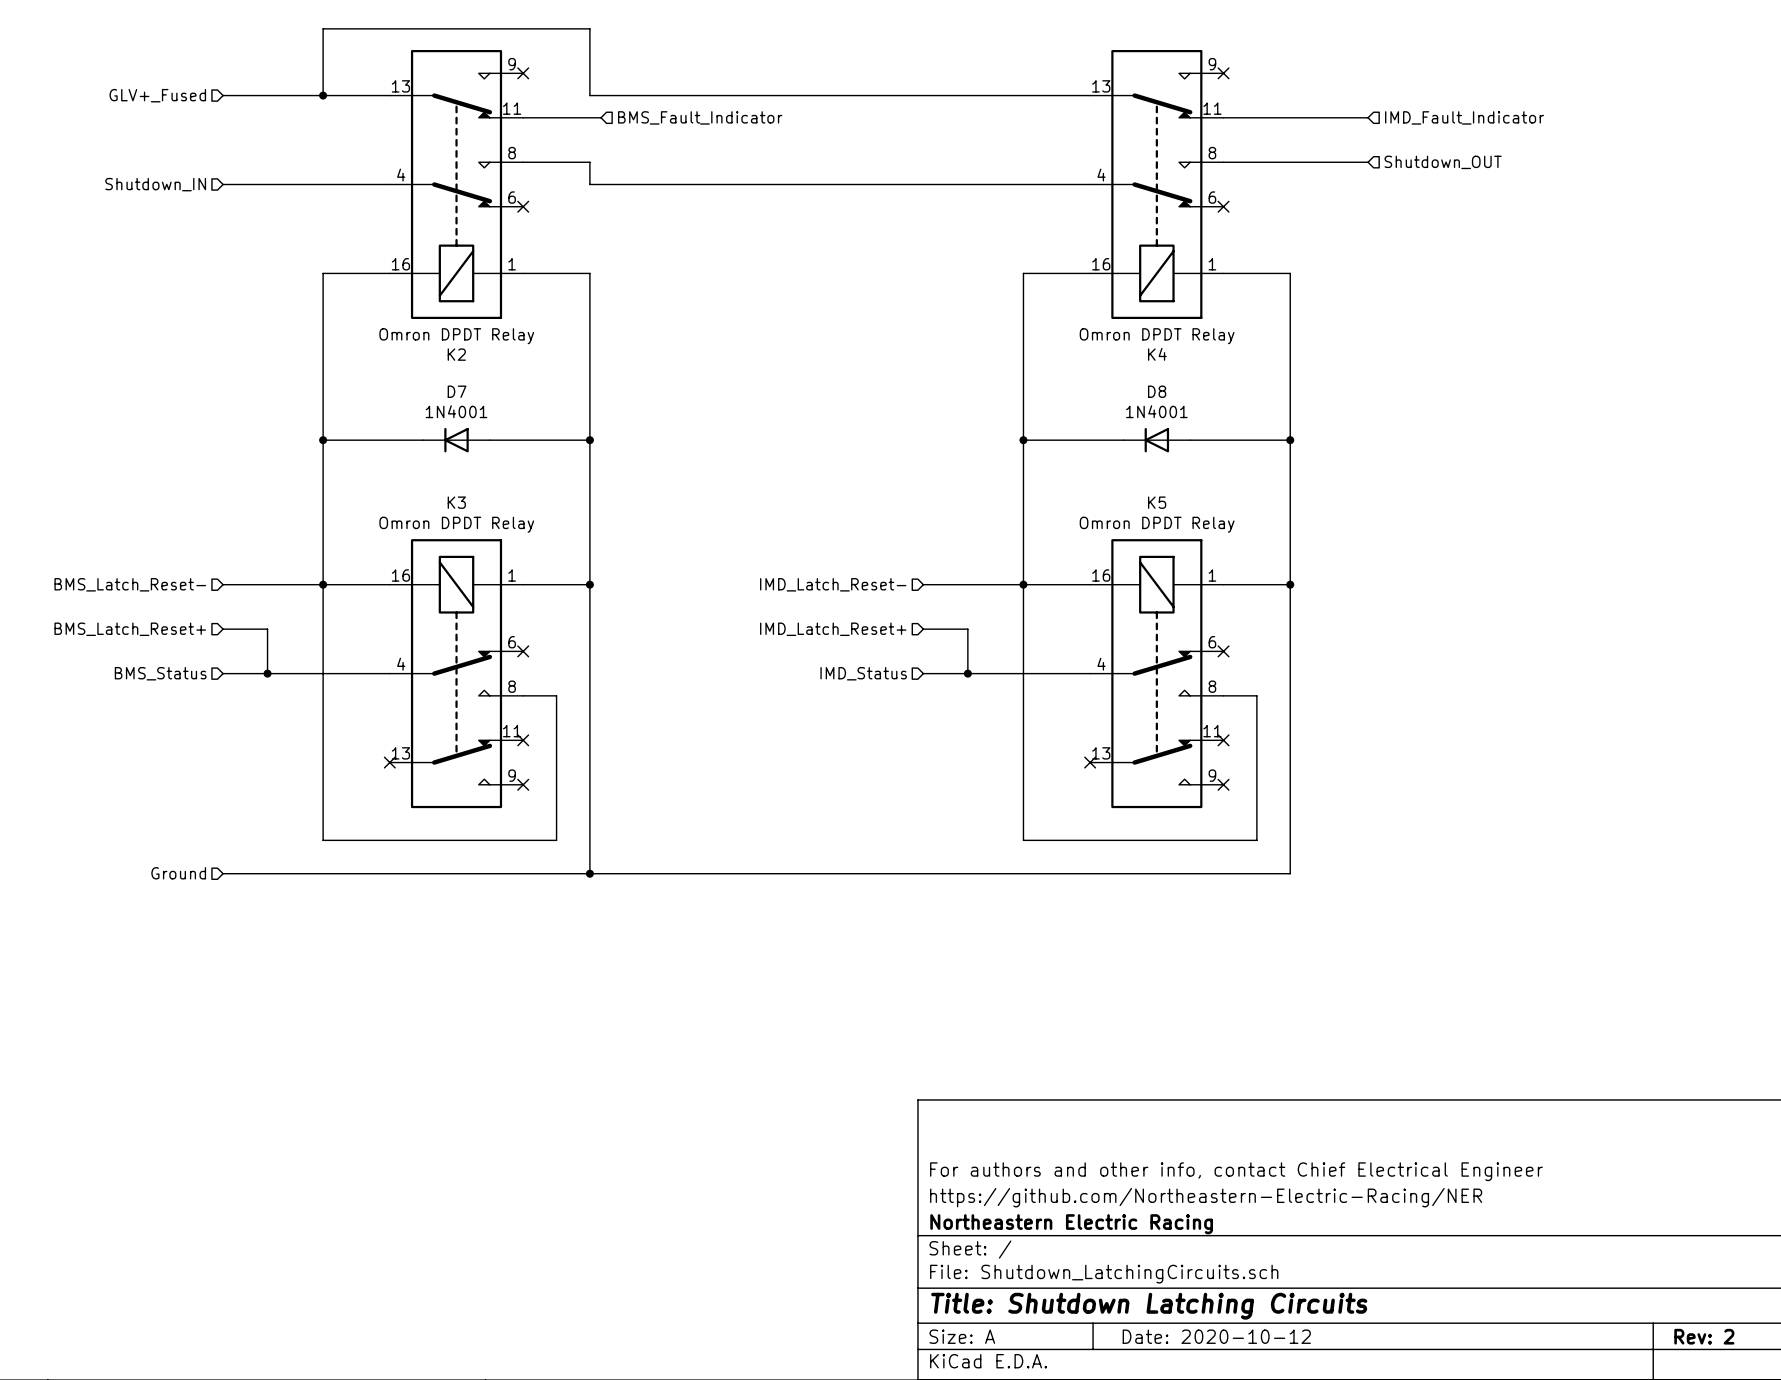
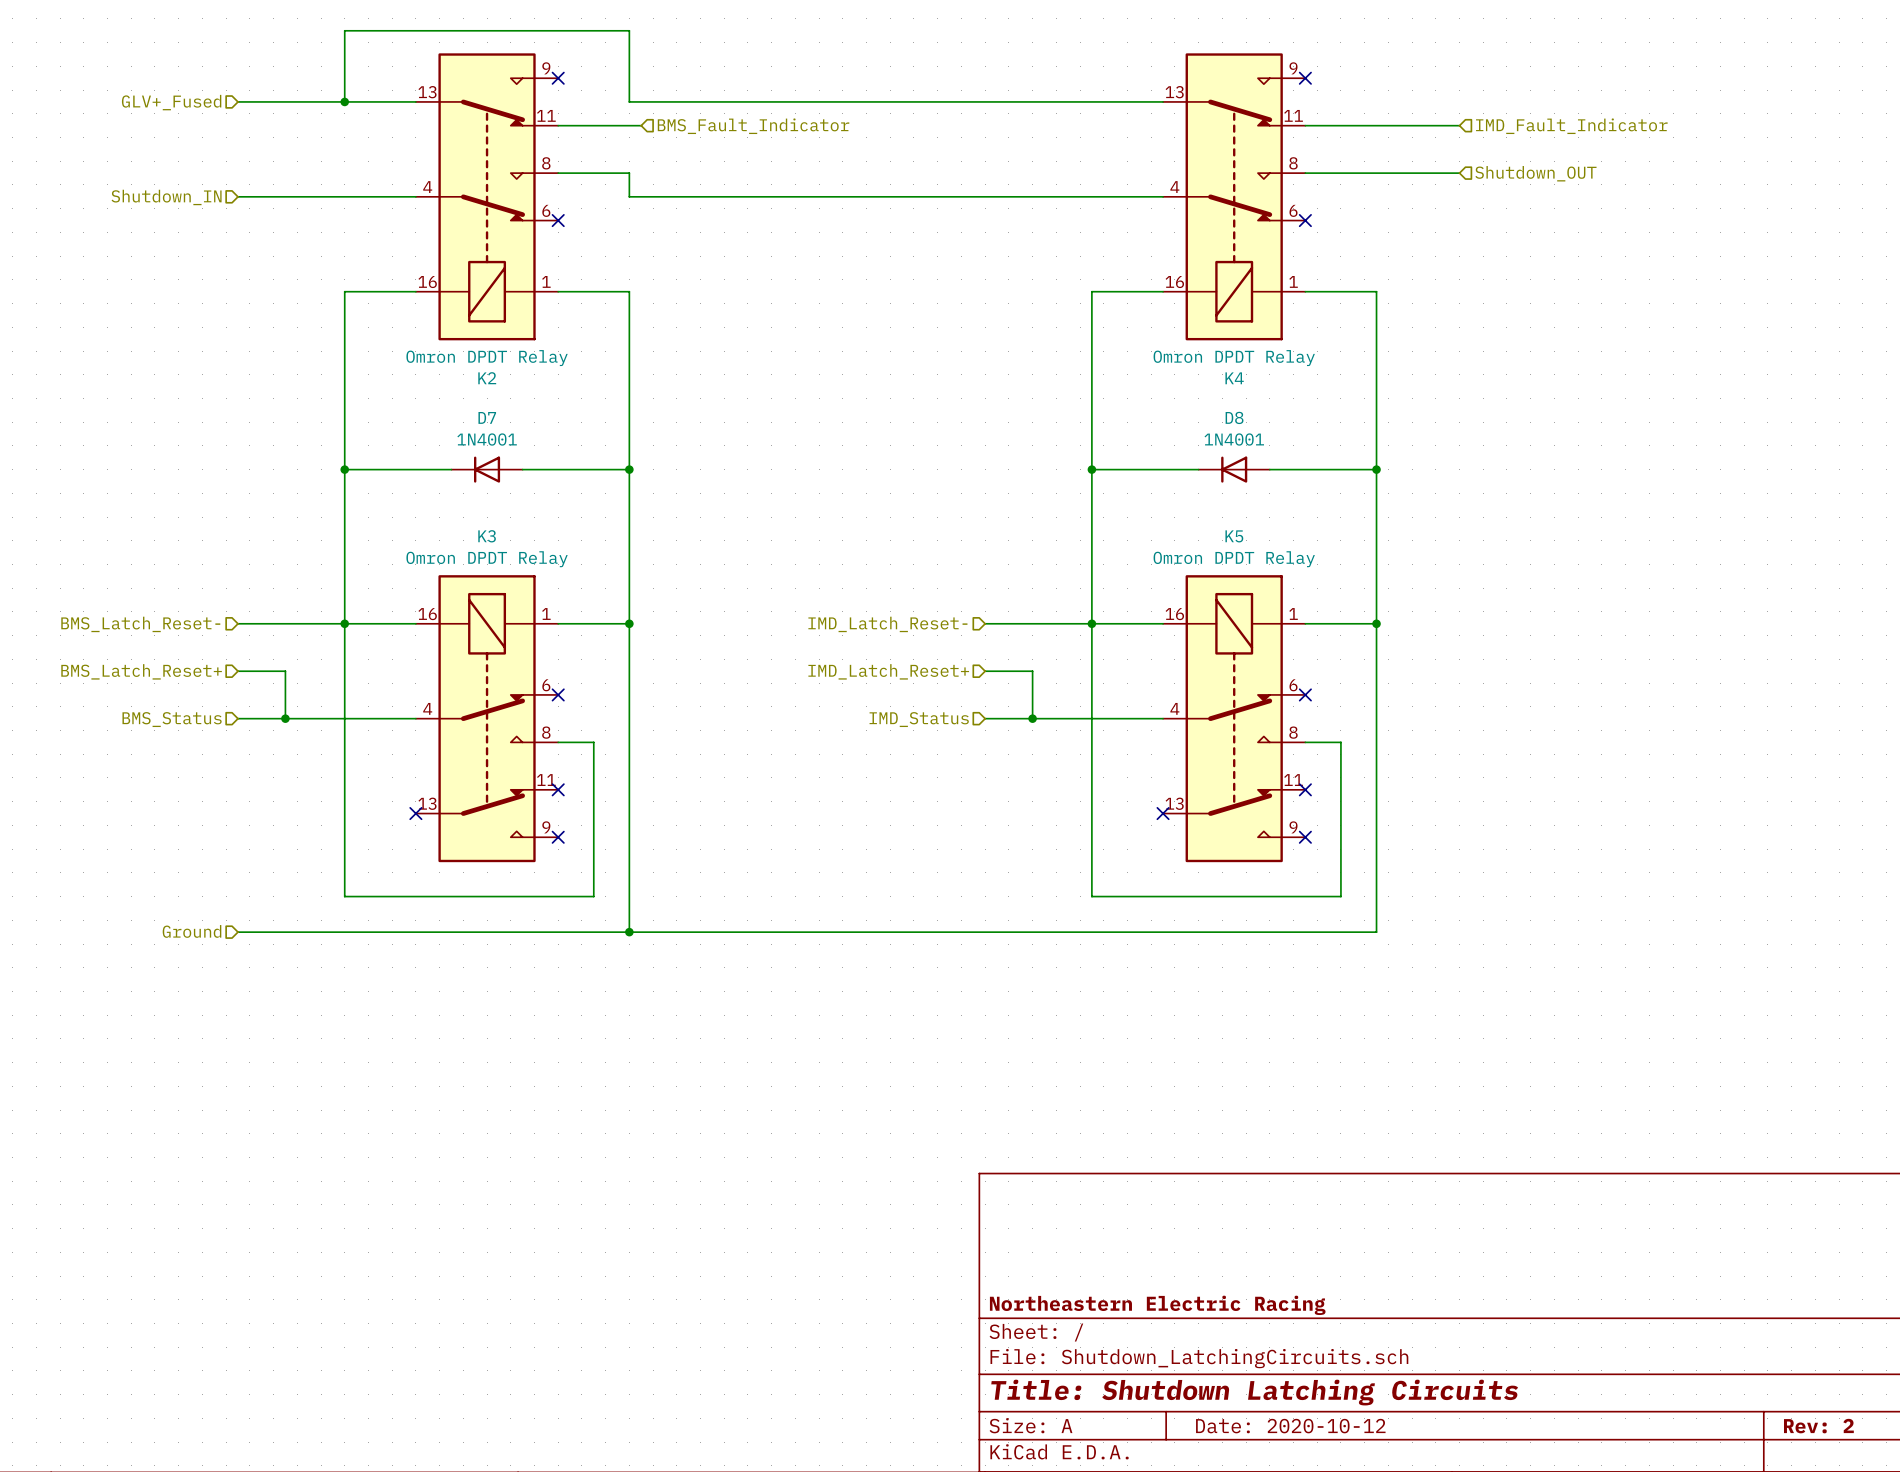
title block: For authors and other info, contact Chief Electrical Engineer (1236, 1171) -> none
title block: https://github.com/Northeastern-Electric-Racing/NER (1206, 1197) -> none

